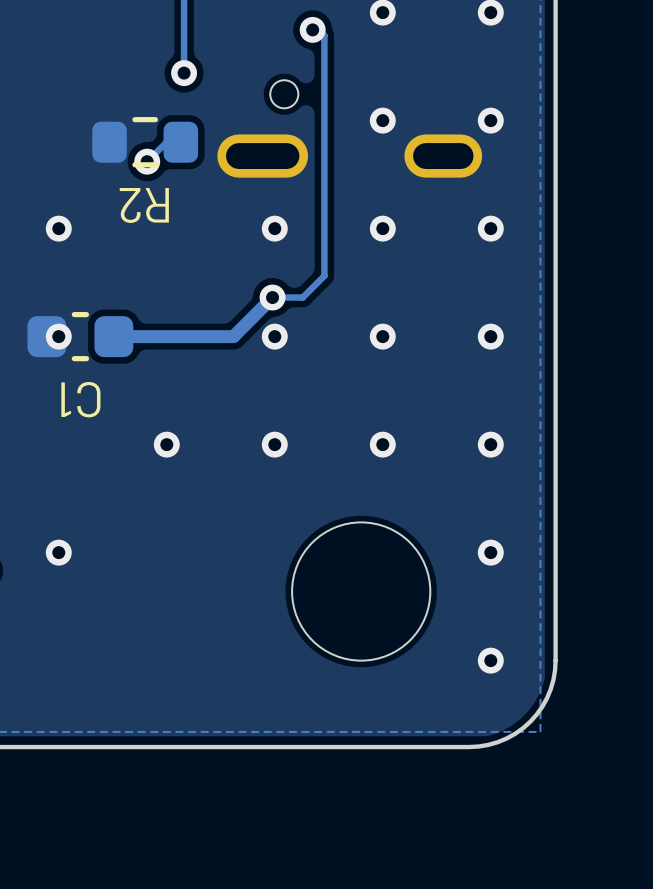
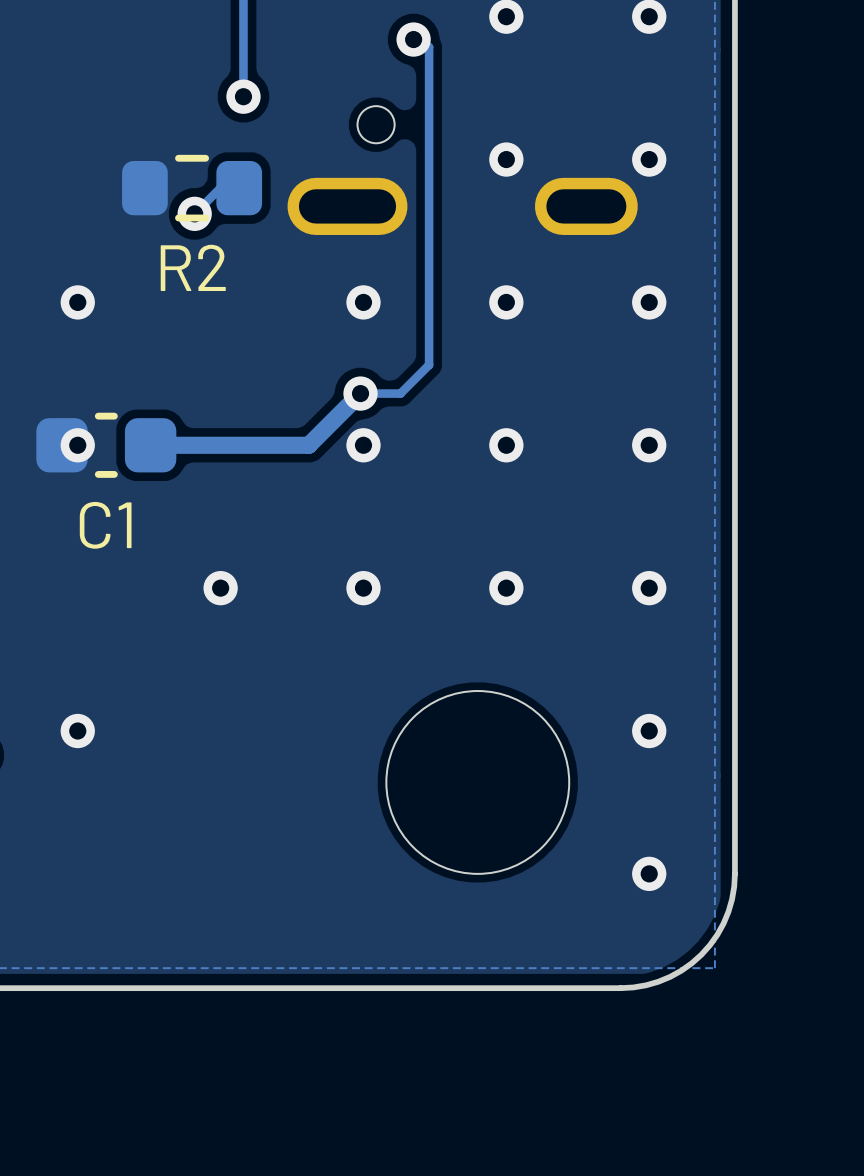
R2 name rotation: 0° (144, 205) -> 180° (193, 267)
C1 name rotation: 0° (80, 399) -> 180° (105, 525)

